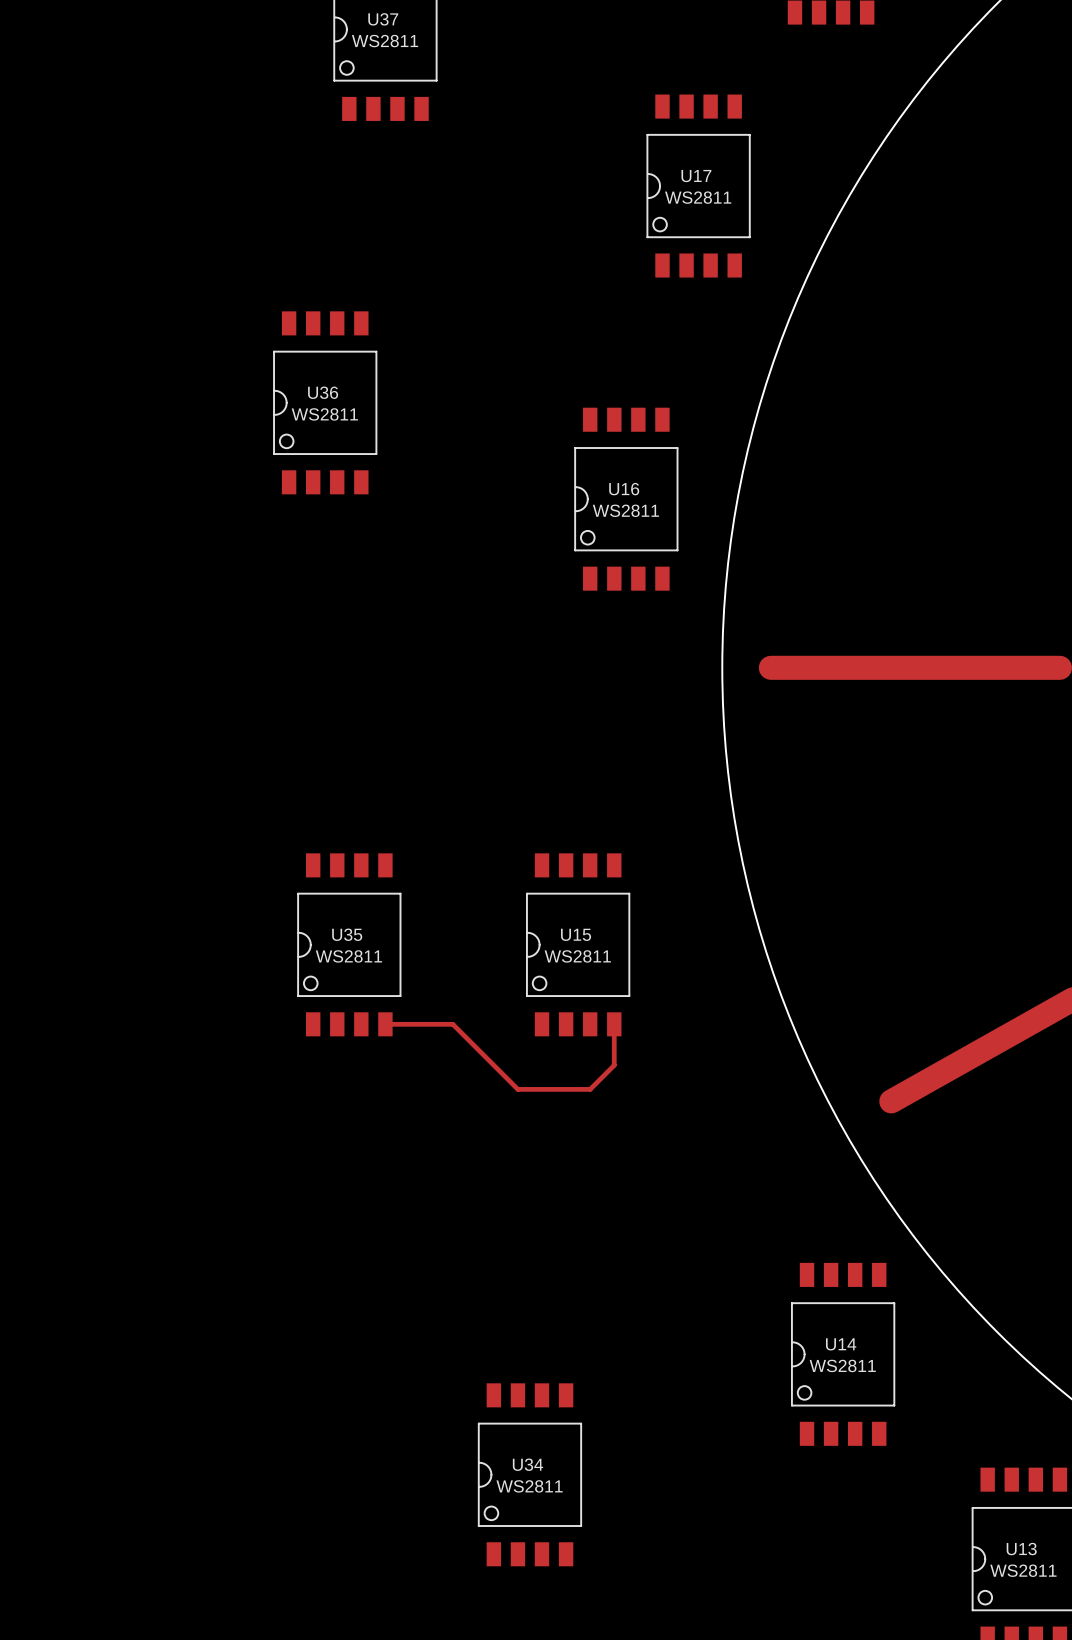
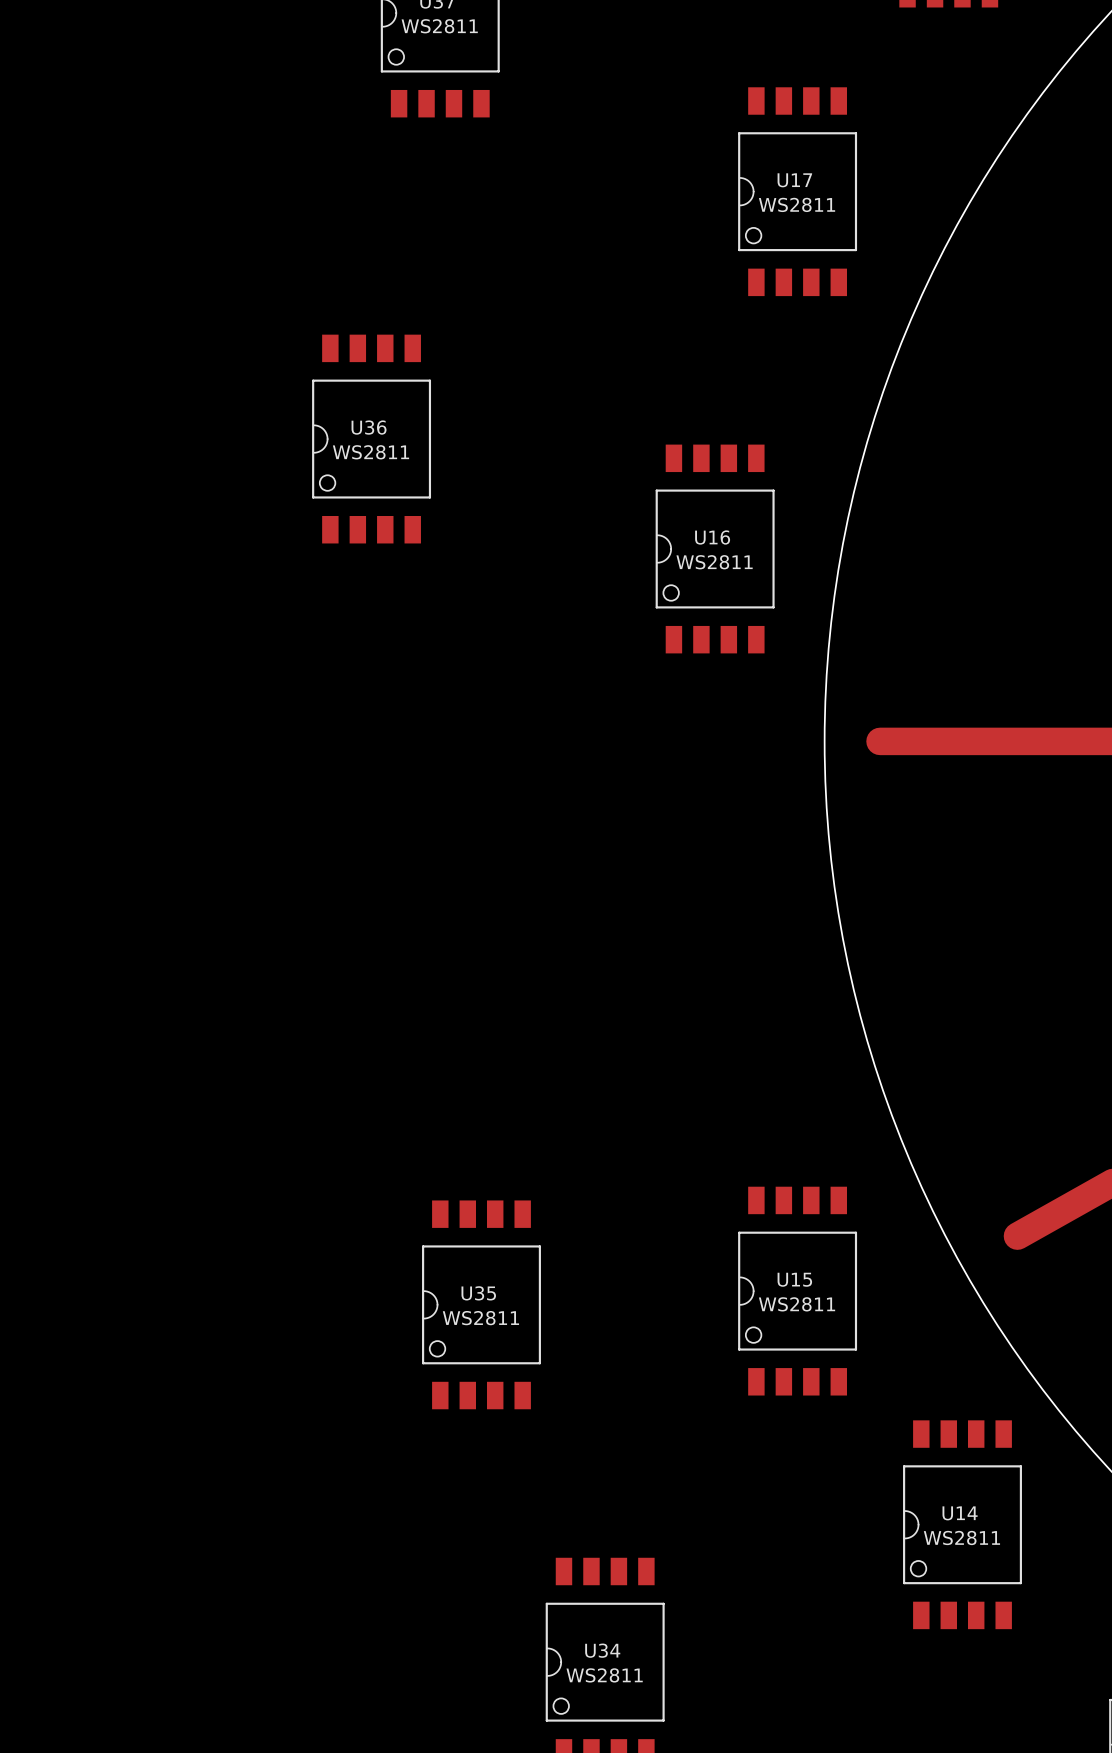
U35 position: (349, 944) -> (481, 1304)
U15 position: (578, 944) -> (797, 1291)
track: (385, 1024) (452, 1024) (517, 1089) (590, 1089) (614, 1065) (614, 1024) -> none

